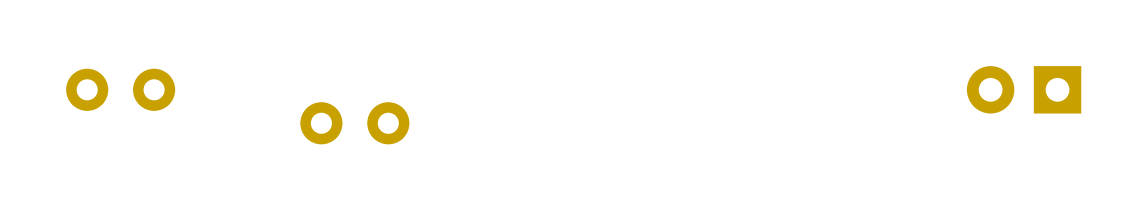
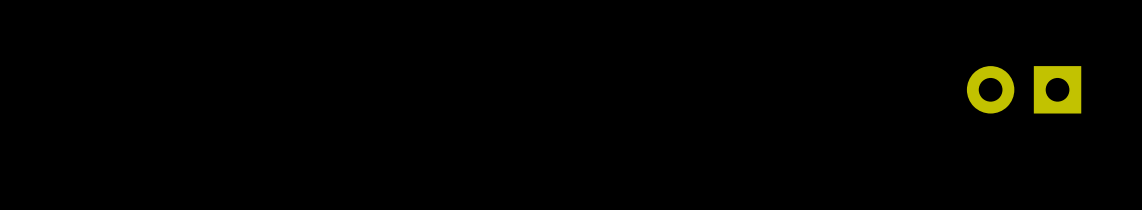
part: (120, 89) -> none
part: (354, 123) -> none

